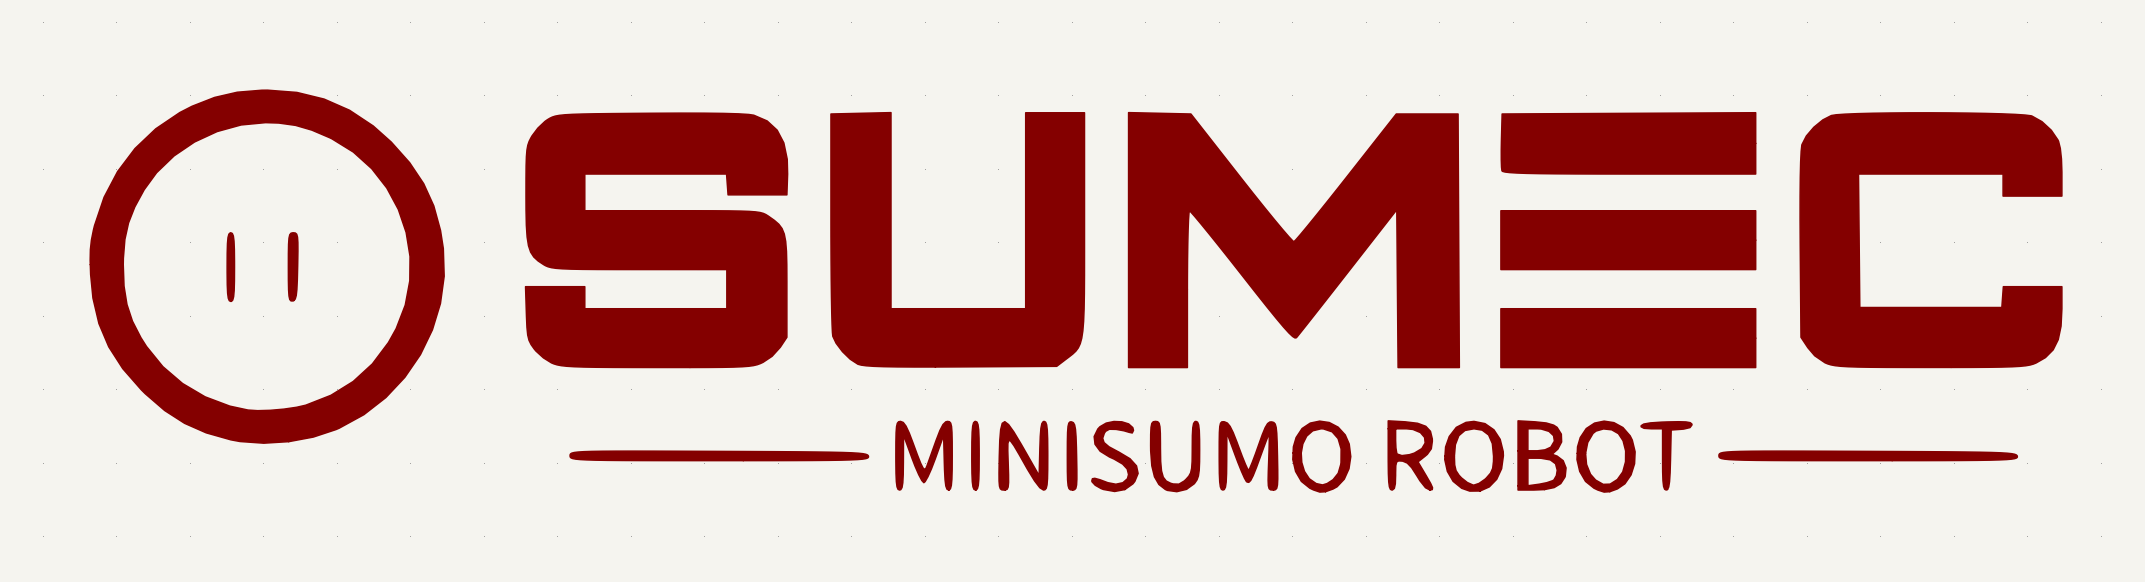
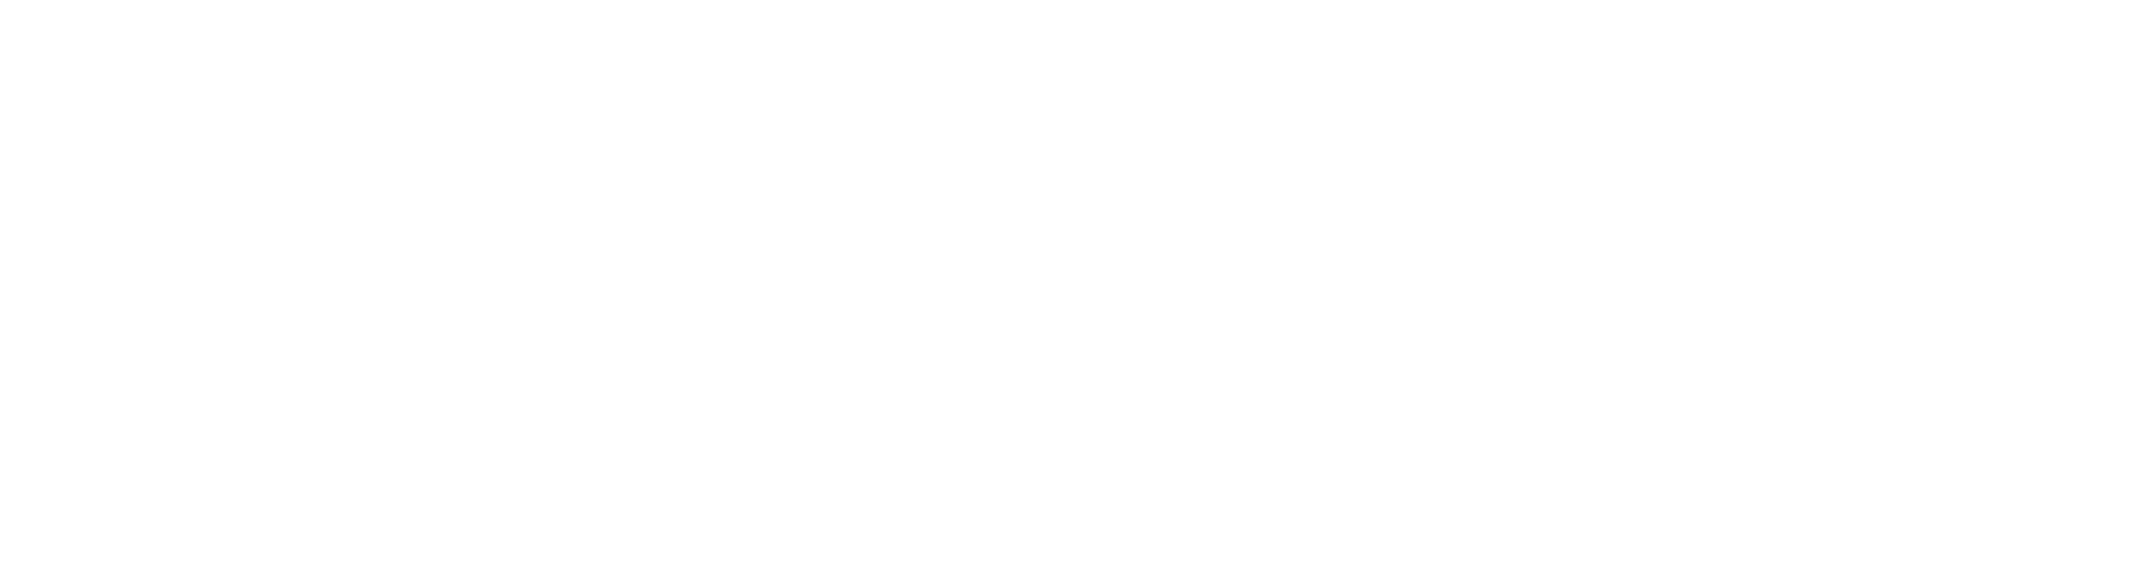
power symbol: (1076, 291) -> none

